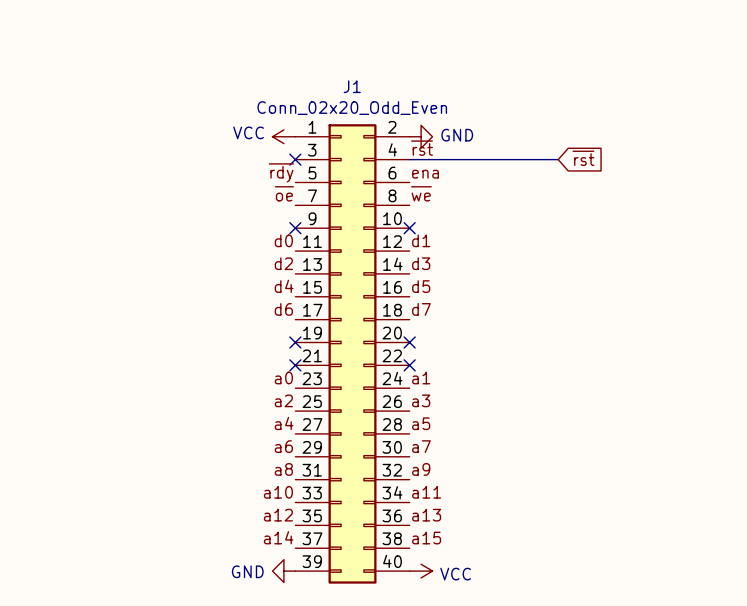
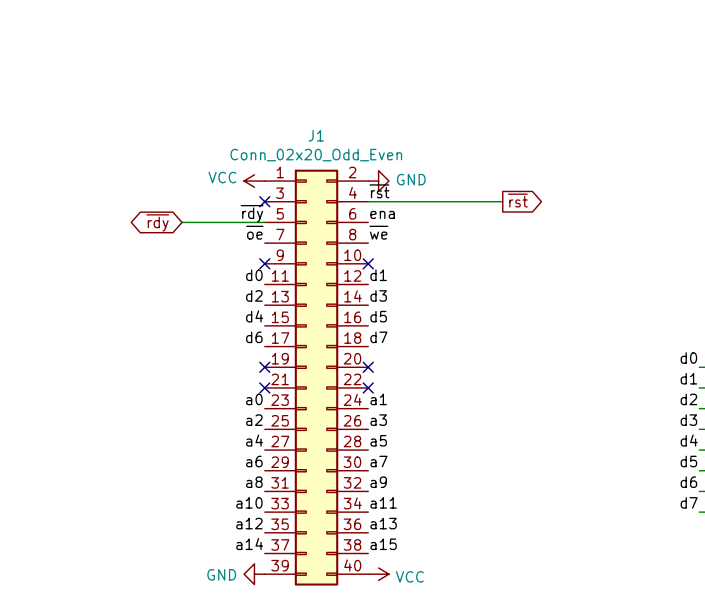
global label shape: input (583, 158) -> output (517, 200)
wire: none -> (182, 222) (264, 222)
global label: none -> ~{rdy} (157, 222)

